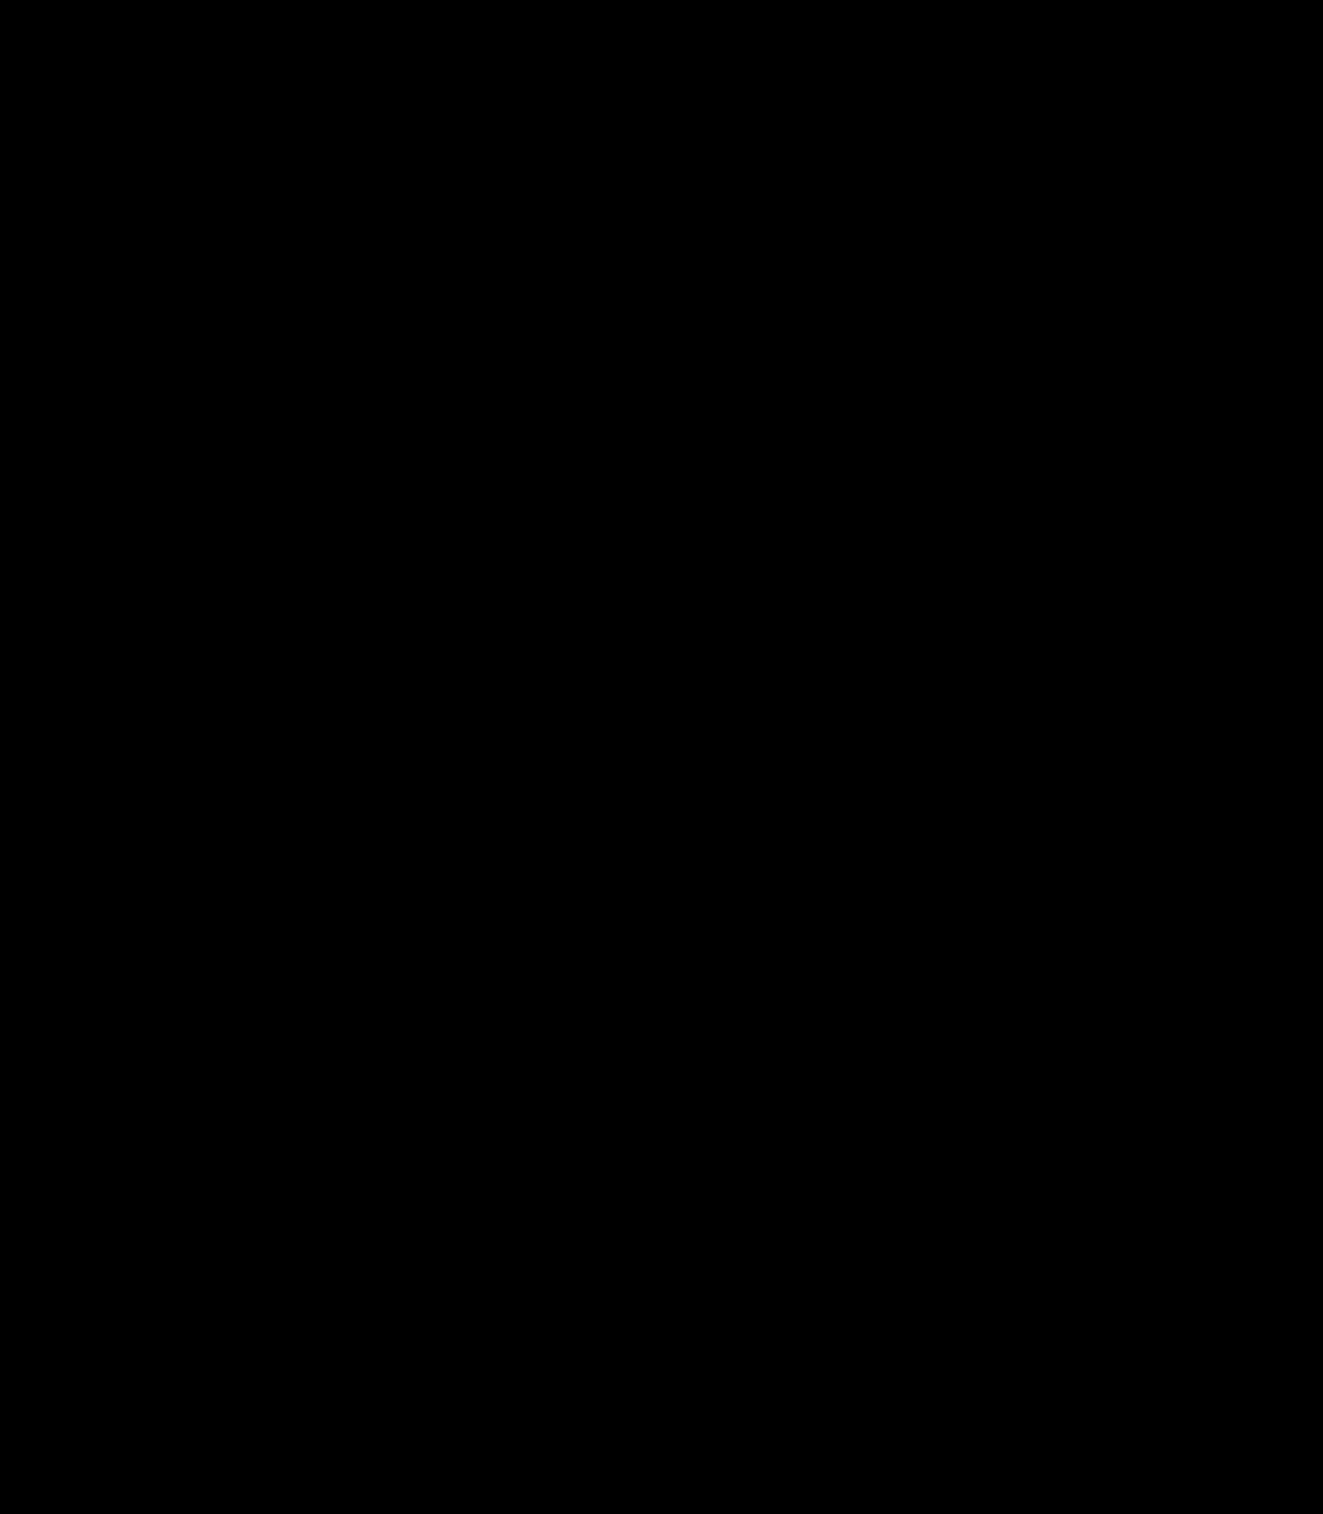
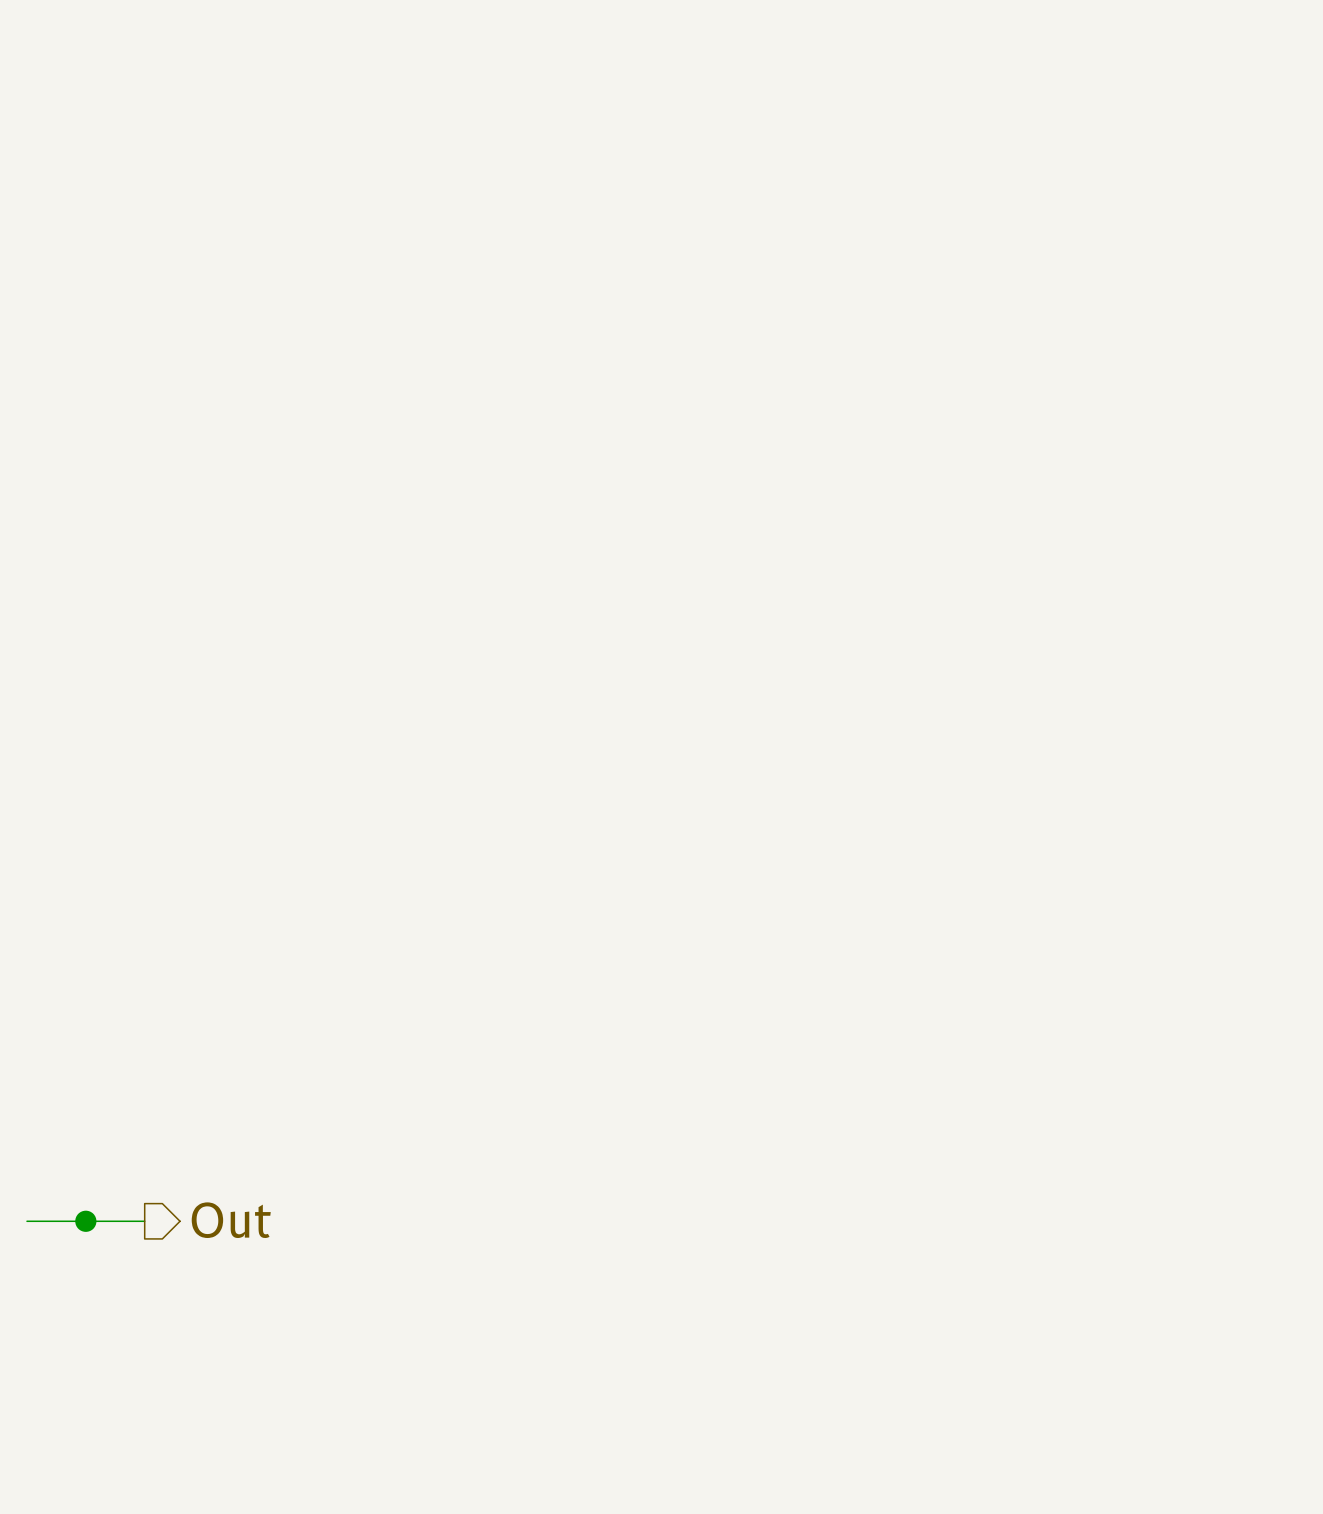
hierarchical label: none -> Out (231, 1220)
wire: none -> (26, 1221) (144, 1221)
junction: none -> (85, 1221)

